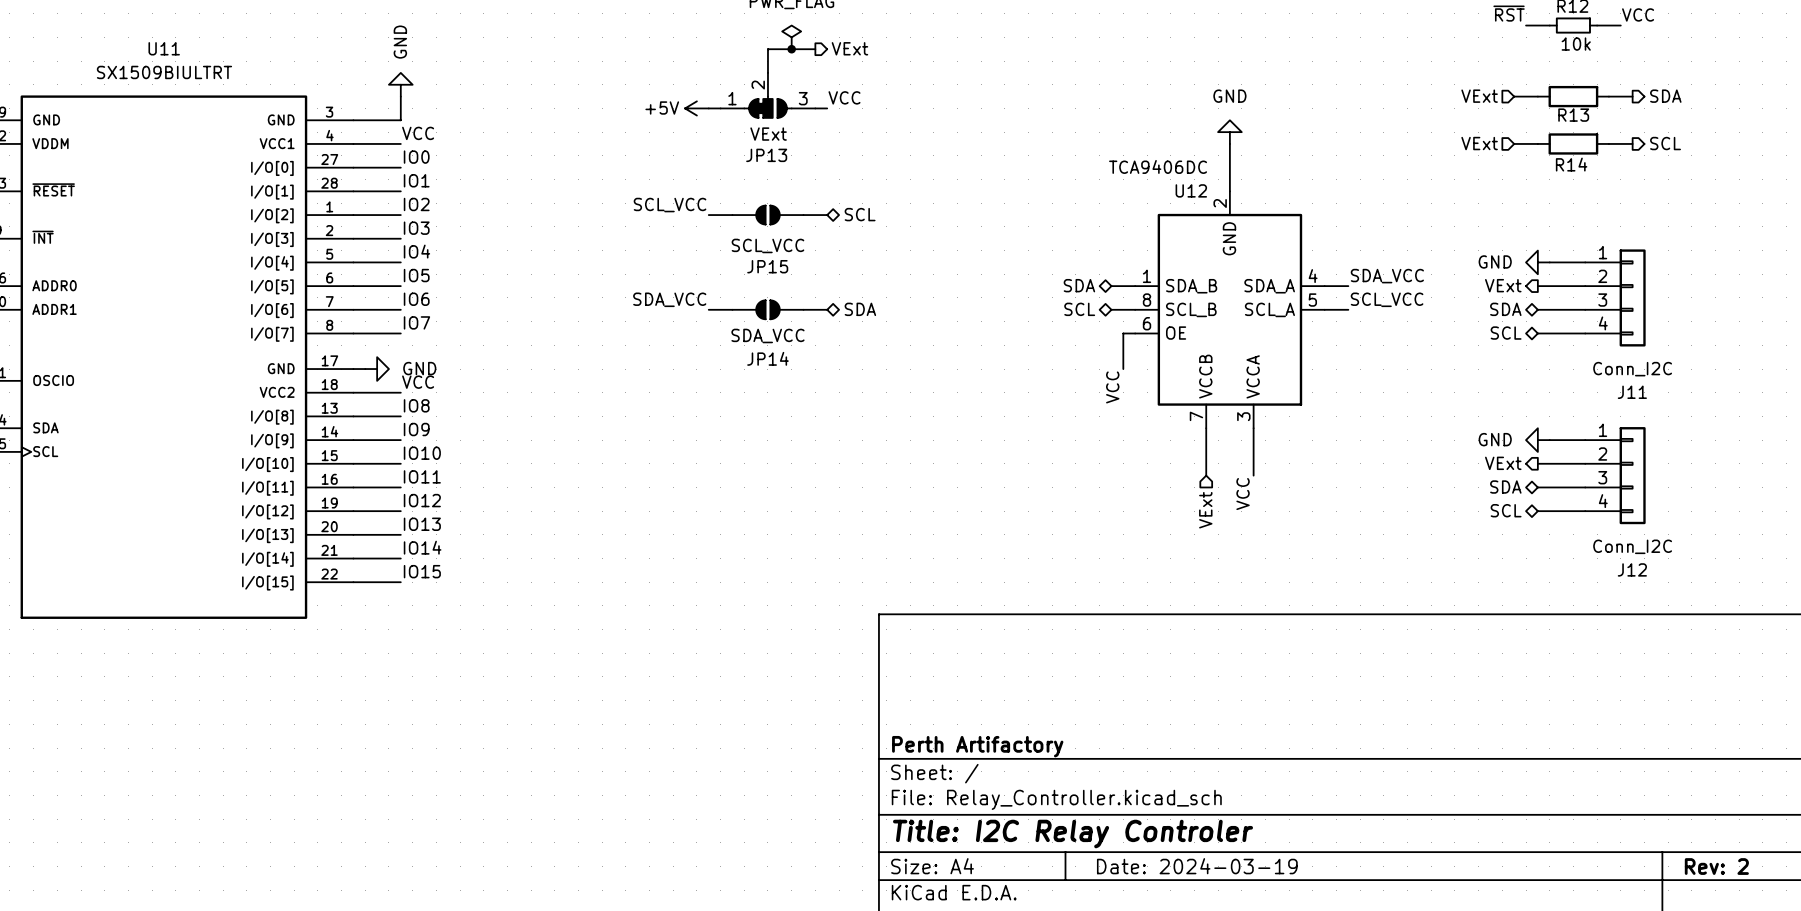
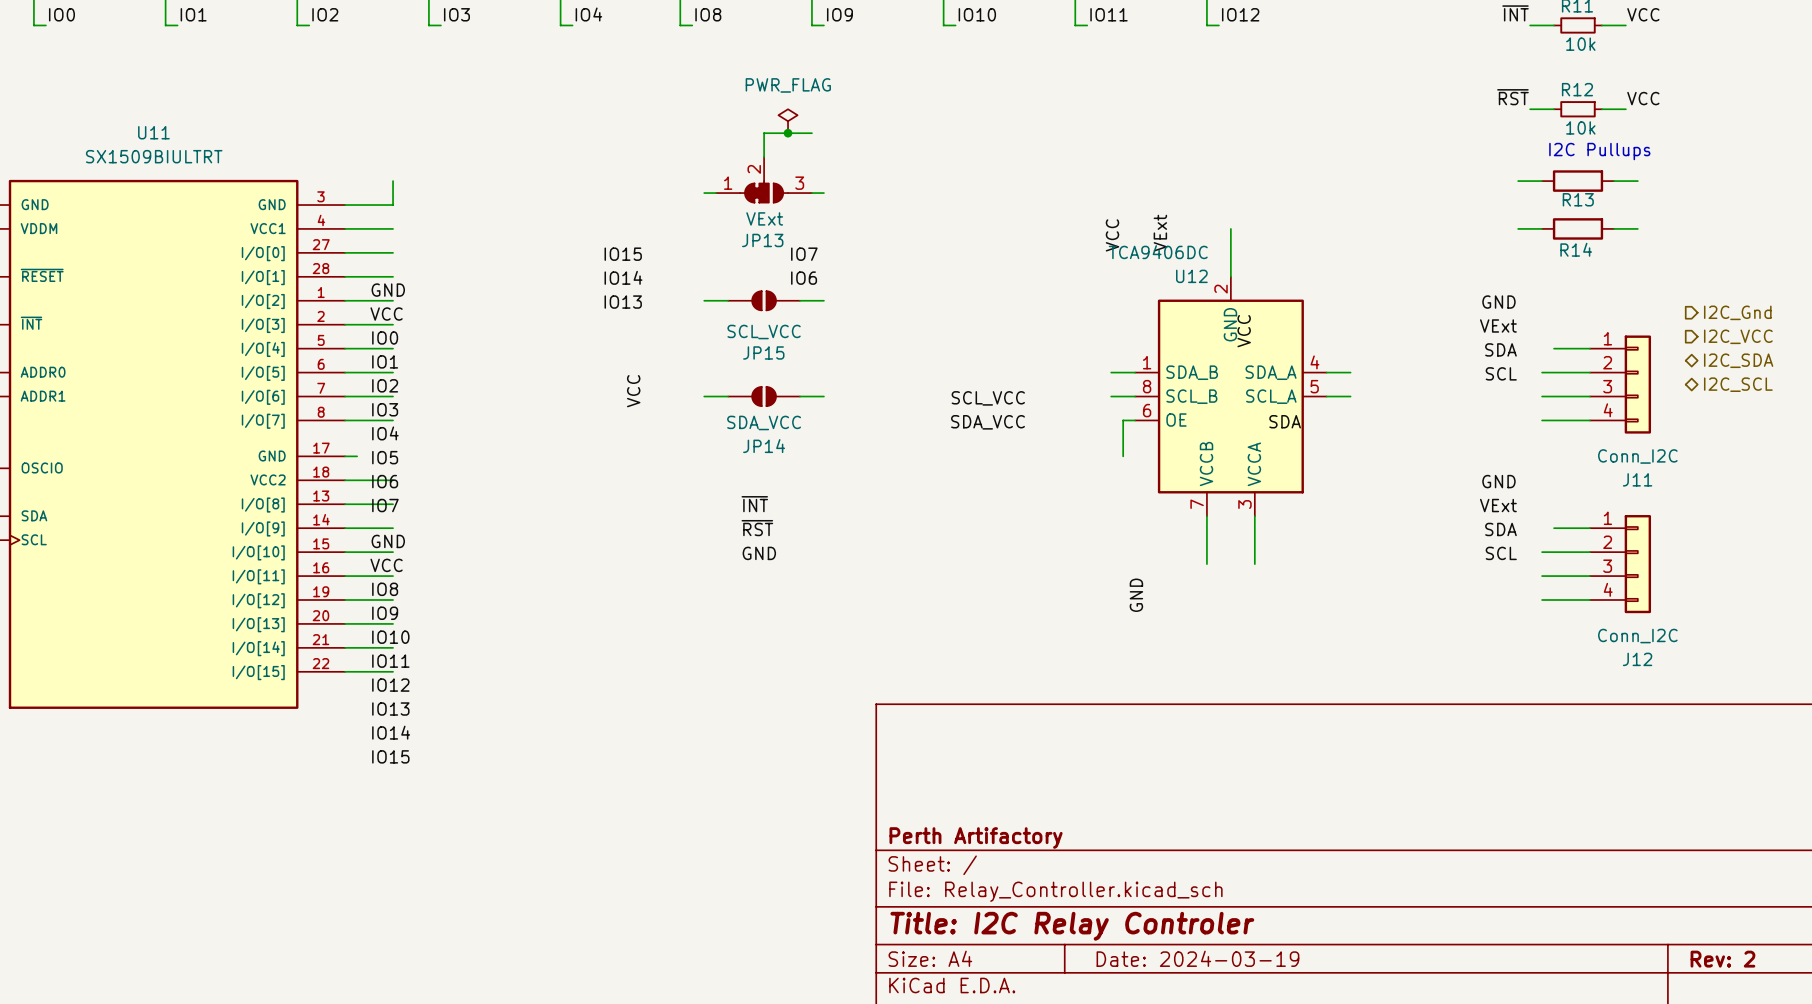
hierarchical label: VExt (849, 48) -> none
text: none -> I2C Pullups (1599, 151)
power symbol: GND (400, 84) -> none
hierarchical label: VExt (1479, 96) -> none
hierarchical label: SDA (1665, 96) -> none
label: VCC (844, 97) -> none
power symbol: +5V (696, 108) -> none
power symbol: GND (1229, 132) -> none
label: VCC (418, 133) -> none
hierarchical label: VExt (1479, 143) -> none
hierarchical label: SCL (1665, 143) -> none
label: none -> VExt (1160, 233)
label: none -> VCC (1112, 235)
label position: IO0 (416, 157) -> IO0 (385, 337)
label: none -> IO15 (623, 254)
label: none -> IO7 (804, 254)
label position: IO1 (416, 180) -> IO1 (385, 361)
label: none -> IO14 (623, 277)
label: none -> IO6 (804, 278)
label: none -> GND (388, 290)
label position: IO2 (416, 204) -> IO2 (385, 385)
label: SCL_VCC (670, 205) -> none
hierarchical label: SCL (860, 214) -> none
label: none -> IO13 (623, 302)
label: none -> GND (1498, 302)
hierarchical label: none -> I2C_Gnd (1737, 312)
label: none -> VCC (386, 314)
label position: IO3 (416, 228) -> IO3 (385, 409)
label: none -> VExt (1498, 325)
label: none -> VCC (1244, 331)
hierarchical label: none -> I2C_VCC (1738, 336)
label position: IO4 (416, 251) -> IO4 (385, 433)
power symbol: GND (1537, 262) -> none
label: none -> SDA (1500, 349)
hierarchical label: none -> I2C_SDA (1738, 360)
label position: IO5 (416, 275) -> IO5 (385, 457)
label: SDA_VCC (1387, 276) -> none
hierarchical label: SDA (1079, 285) -> none
hierarchical label: VExt (1503, 285) -> none
label: none -> SCL (1501, 373)
hierarchical label: none -> I2C_SCL (1738, 384)
label position: IO6 (416, 299) -> IO6 (385, 481)
label: SDA_VCC (669, 299) -> none
label: SCL_VCC (1387, 299) -> none
label: none -> VCC (633, 391)
hierarchical label: SDA (860, 309) -> none
hierarchical label: SCL (1079, 309) -> none
hierarchical label: SDA (1505, 309) -> none
label: none -> SCL_VCC (988, 398)
label position: IO7 (416, 322) -> IO7 (385, 505)
hierarchical label: SCL (1506, 333) -> none
label: none -> SDA (1285, 421)
label: none -> SDA_VCC (987, 422)
power symbol: GND (377, 369) -> none
label: VCC (418, 382) -> none
label: VCC (1112, 387) -> none
label: none -> GND (1498, 481)
label position: IO8 (416, 405) -> IO8 (385, 589)
label: none -> ~{INT} (754, 504)
label: none -> VExt (1498, 505)
label position: IO9 (416, 429) -> IO9 (385, 613)
label: none -> ~{RST} (757, 528)
power symbol: GND (1537, 440) -> none
label: none -> SDA (1500, 529)
label: none -> GND (388, 541)
label position: IO10 (422, 453) -> IO10 (390, 637)
hierarchical label: VExt (1503, 463) -> none
label: none -> GND (759, 553)
label: none -> SCL (1501, 553)
label: none -> VCC (386, 565)
label position: IO11 (422, 476) -> IO11 (390, 661)
hierarchical label: SDA (1505, 487) -> none
label: VCC (1243, 494) -> none
label position: IO12 (422, 500) -> IO12 (390, 685)
label: none -> GND (1136, 595)
hierarchical label: VExt (1205, 510) -> none
hierarchical label: SCL (1506, 510) -> none
label position: IO13 (422, 524) -> IO13 (390, 709)
label position: IO14 (422, 547) -> IO14 (391, 732)
label position: IO15 (422, 571) -> IO15 (390, 756)

